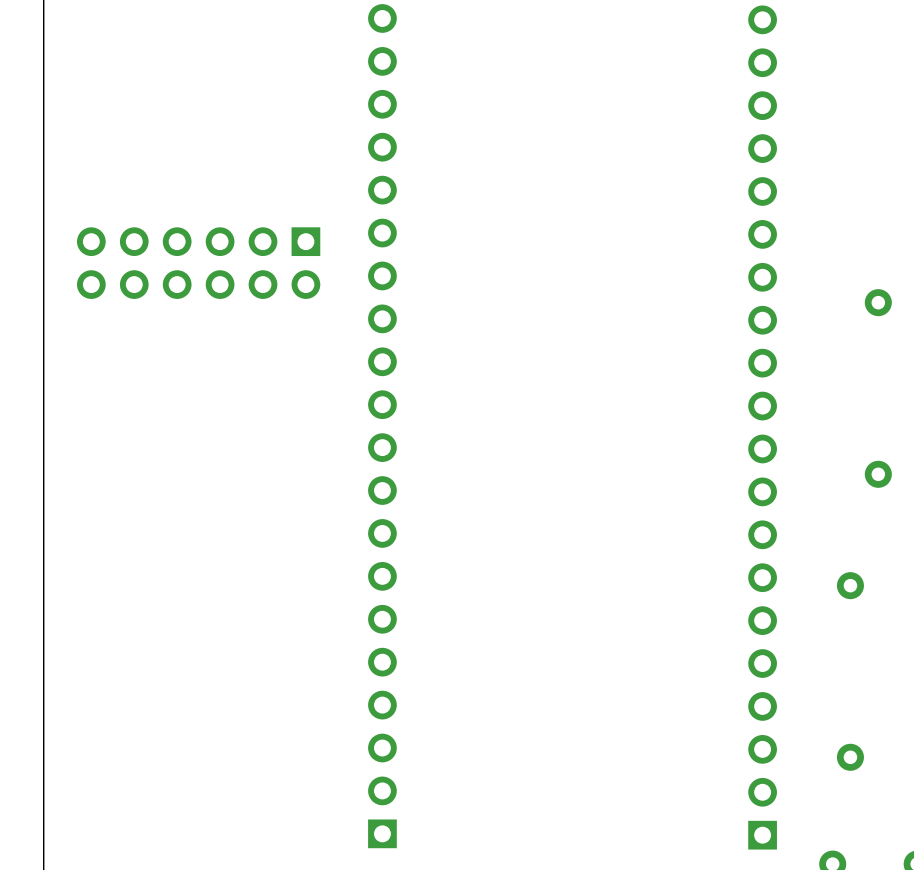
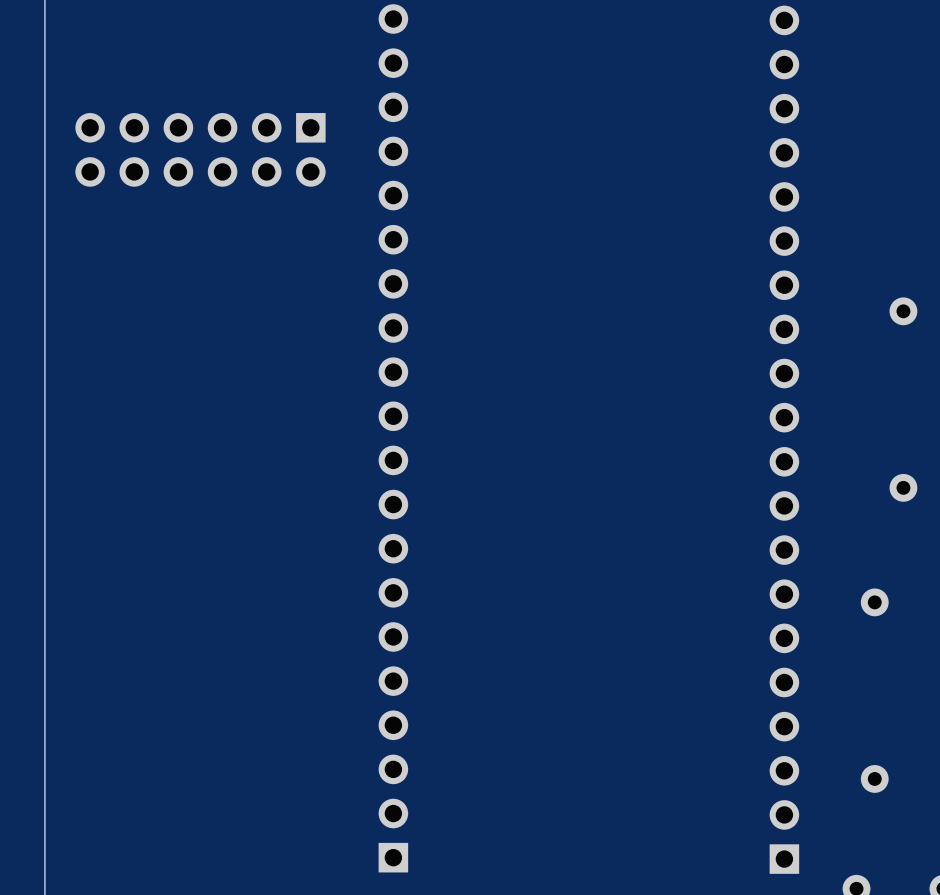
part position: (198, 263) -> (200, 149)

